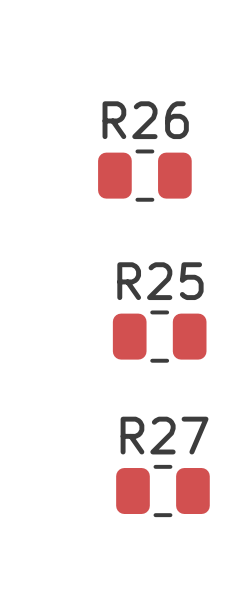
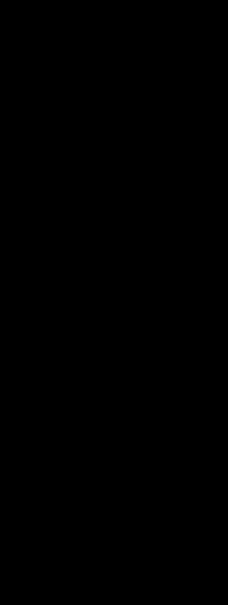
R26: (144, 175) -> none
R25: (159, 336) -> none
R27: (162, 491) -> none

